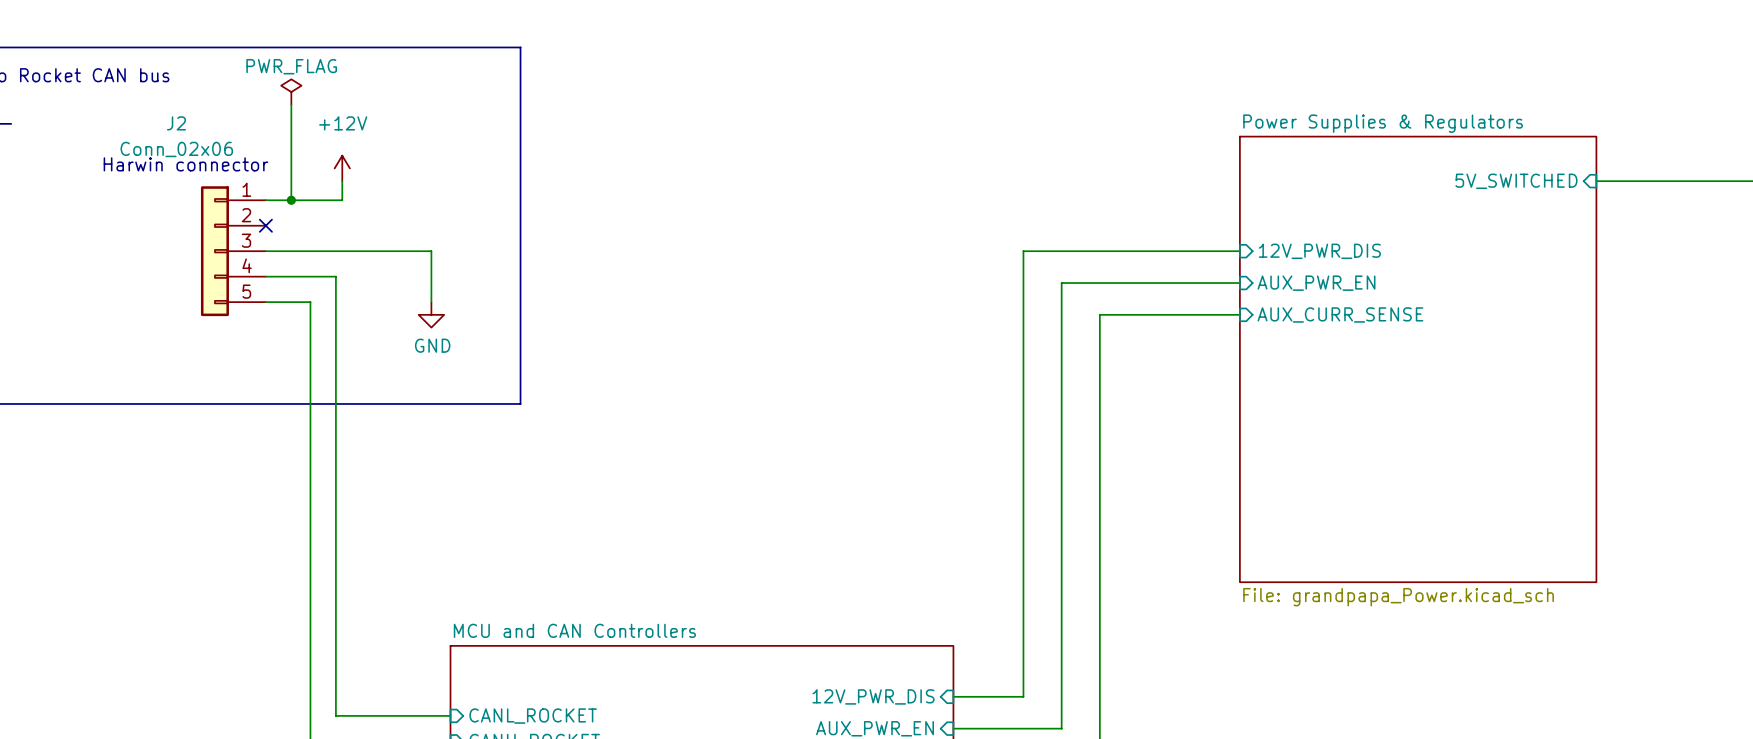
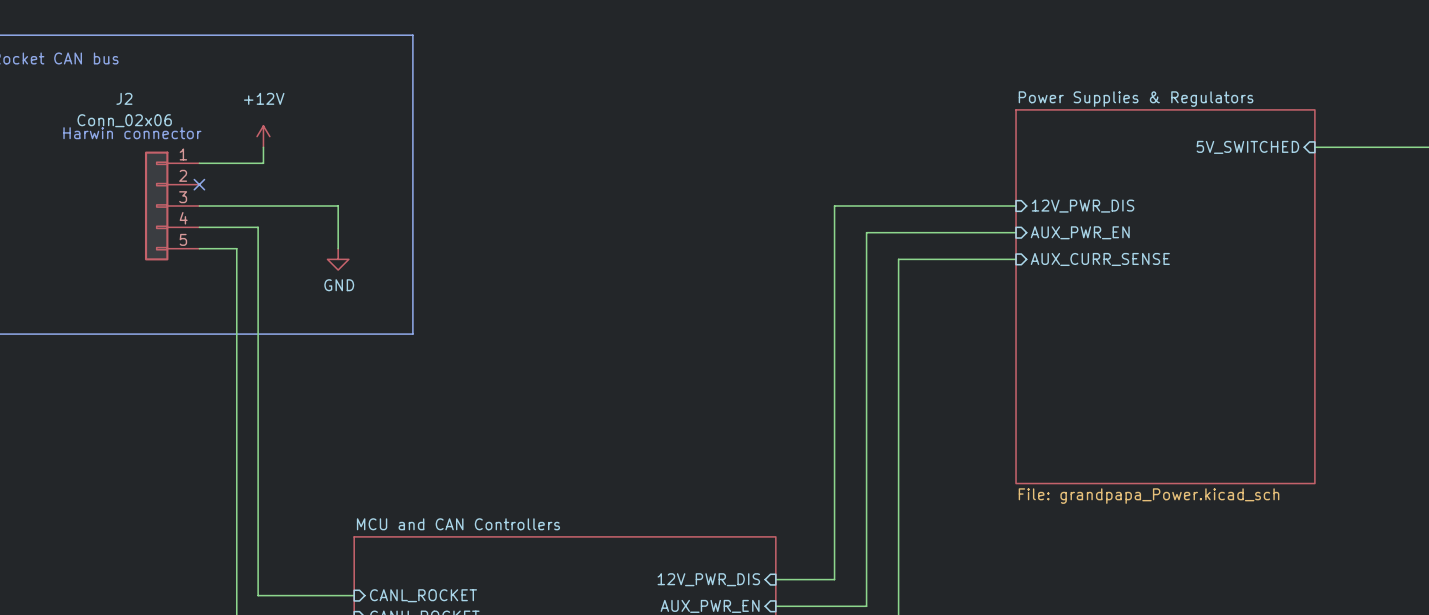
power symbol: PWR_FLAG (291, 92) -> none
wire: (291, 104) (291, 200) -> none
junction: (291, 200) -> none

